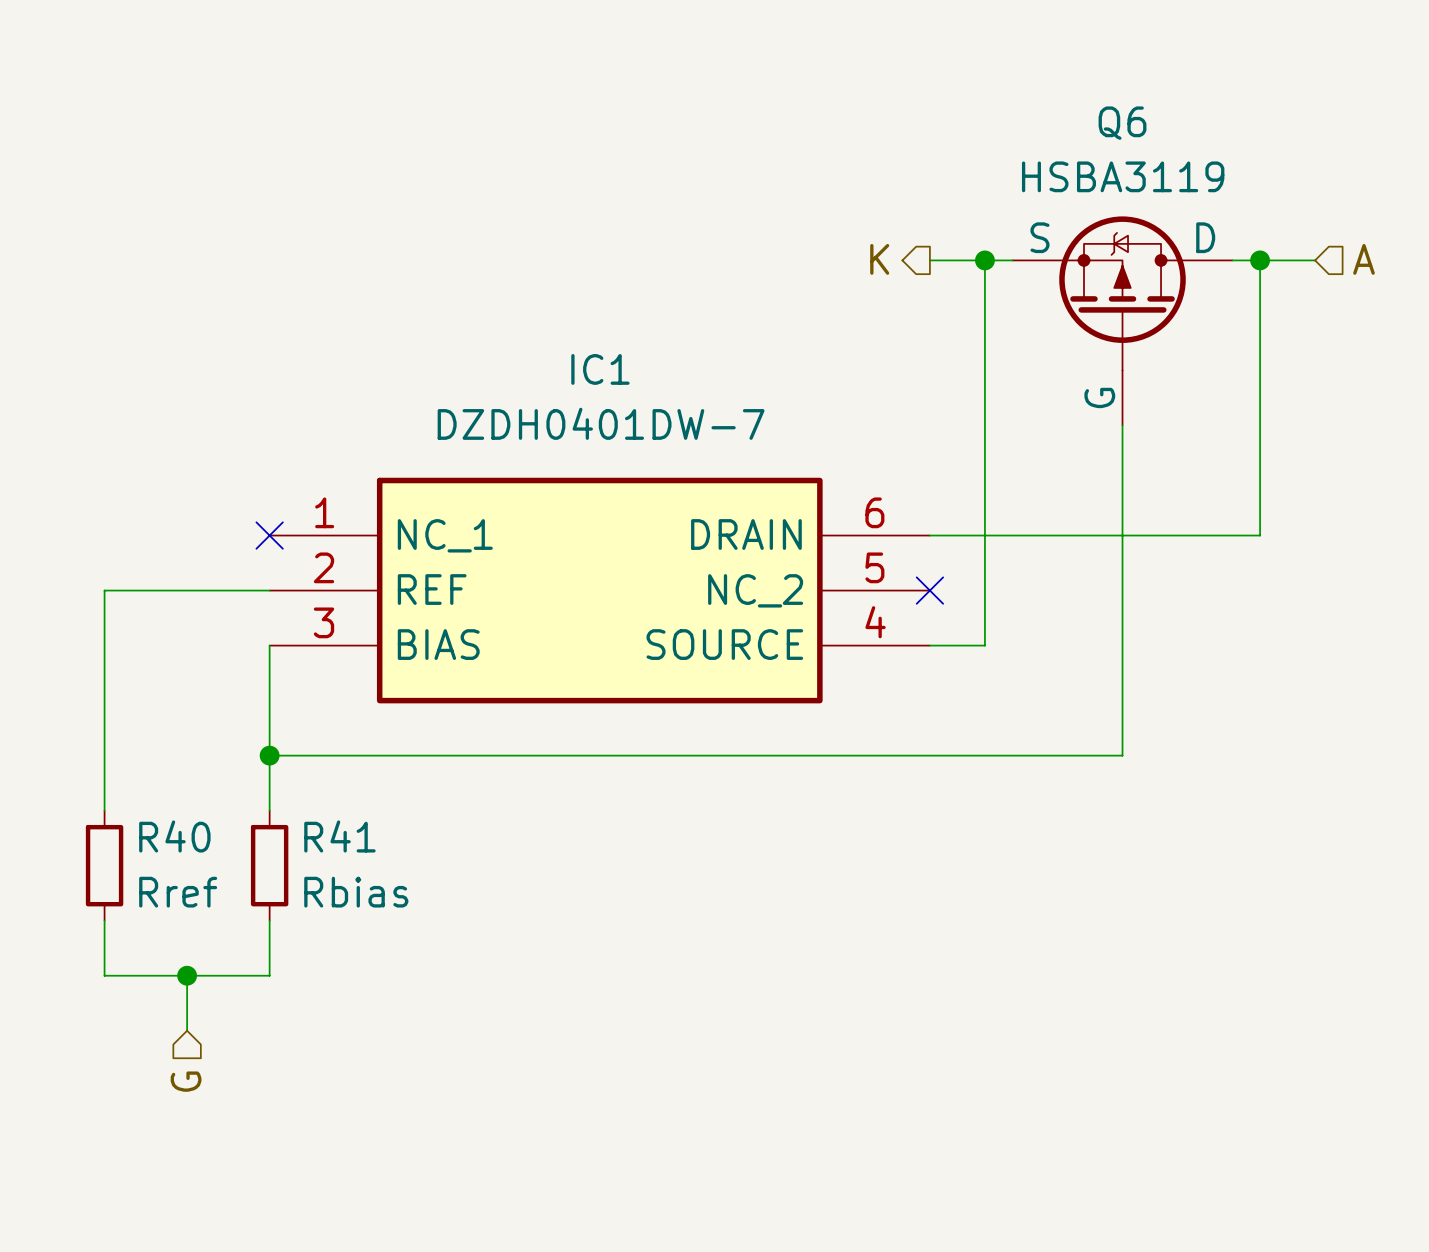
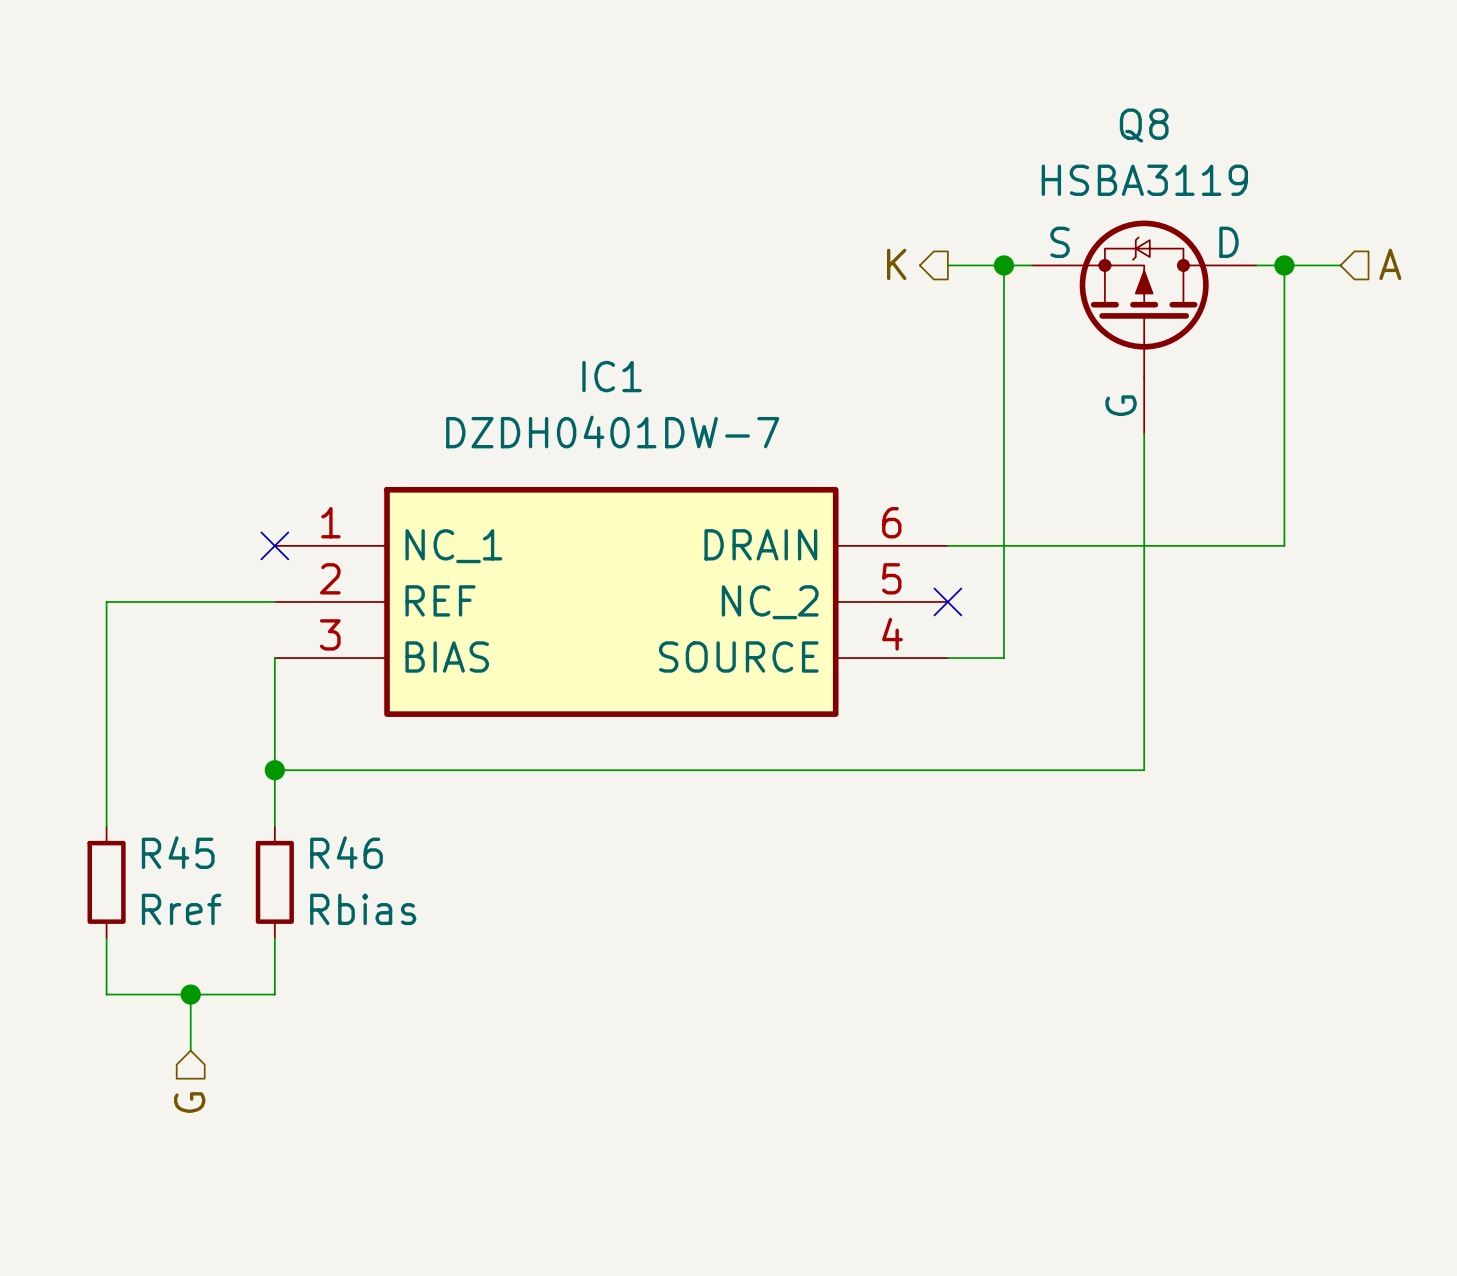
Q6 name: Q6 (1122, 123) -> Q8 (1144, 125)
R40 name: R40 (174, 836) -> R45 (178, 852)
R41 name: R41 (339, 836) -> R46 (346, 852)

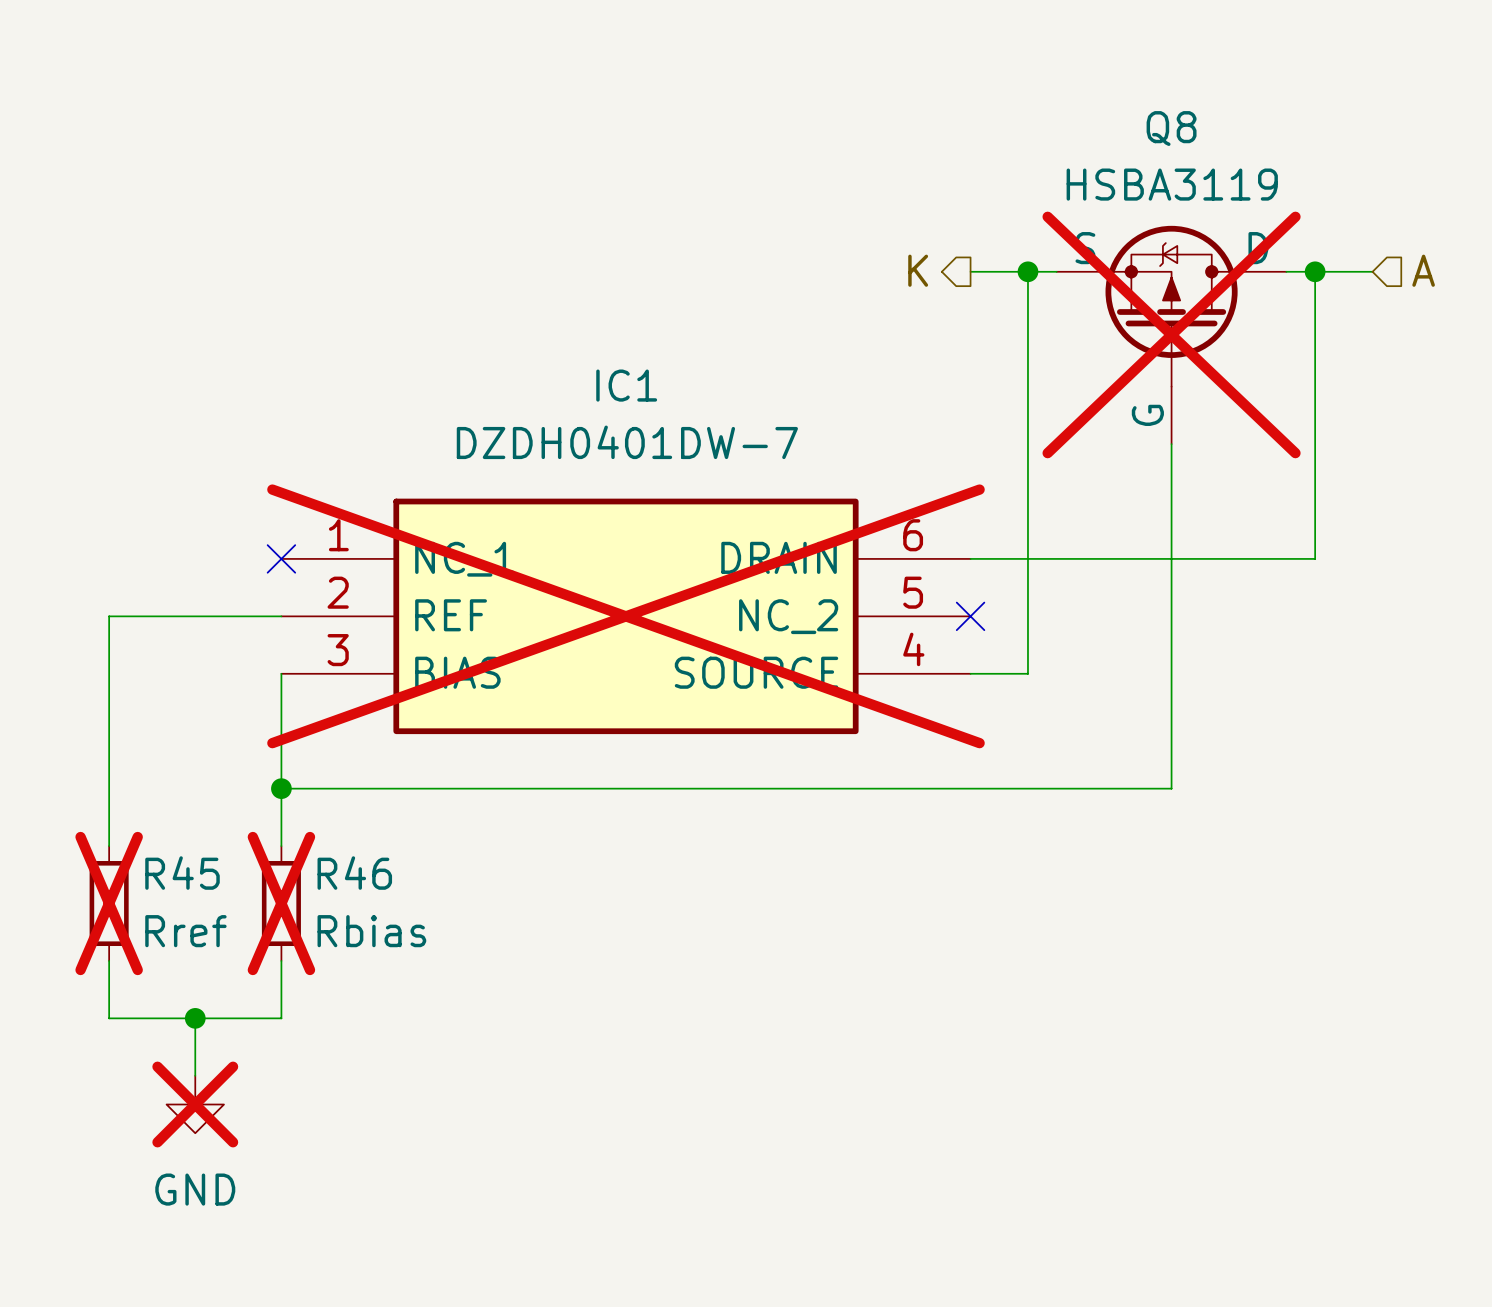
Q8 do-not-place cross: none -> (1171, 334)
IC1 do-not-place cross: none -> (625, 616)
R45 do-not-place cross: none -> (109, 903)
R46 do-not-place cross: none -> (281, 903)
power symbol: none -> GND (195, 1104)
hierarchical label: G (189, 1102) -> none

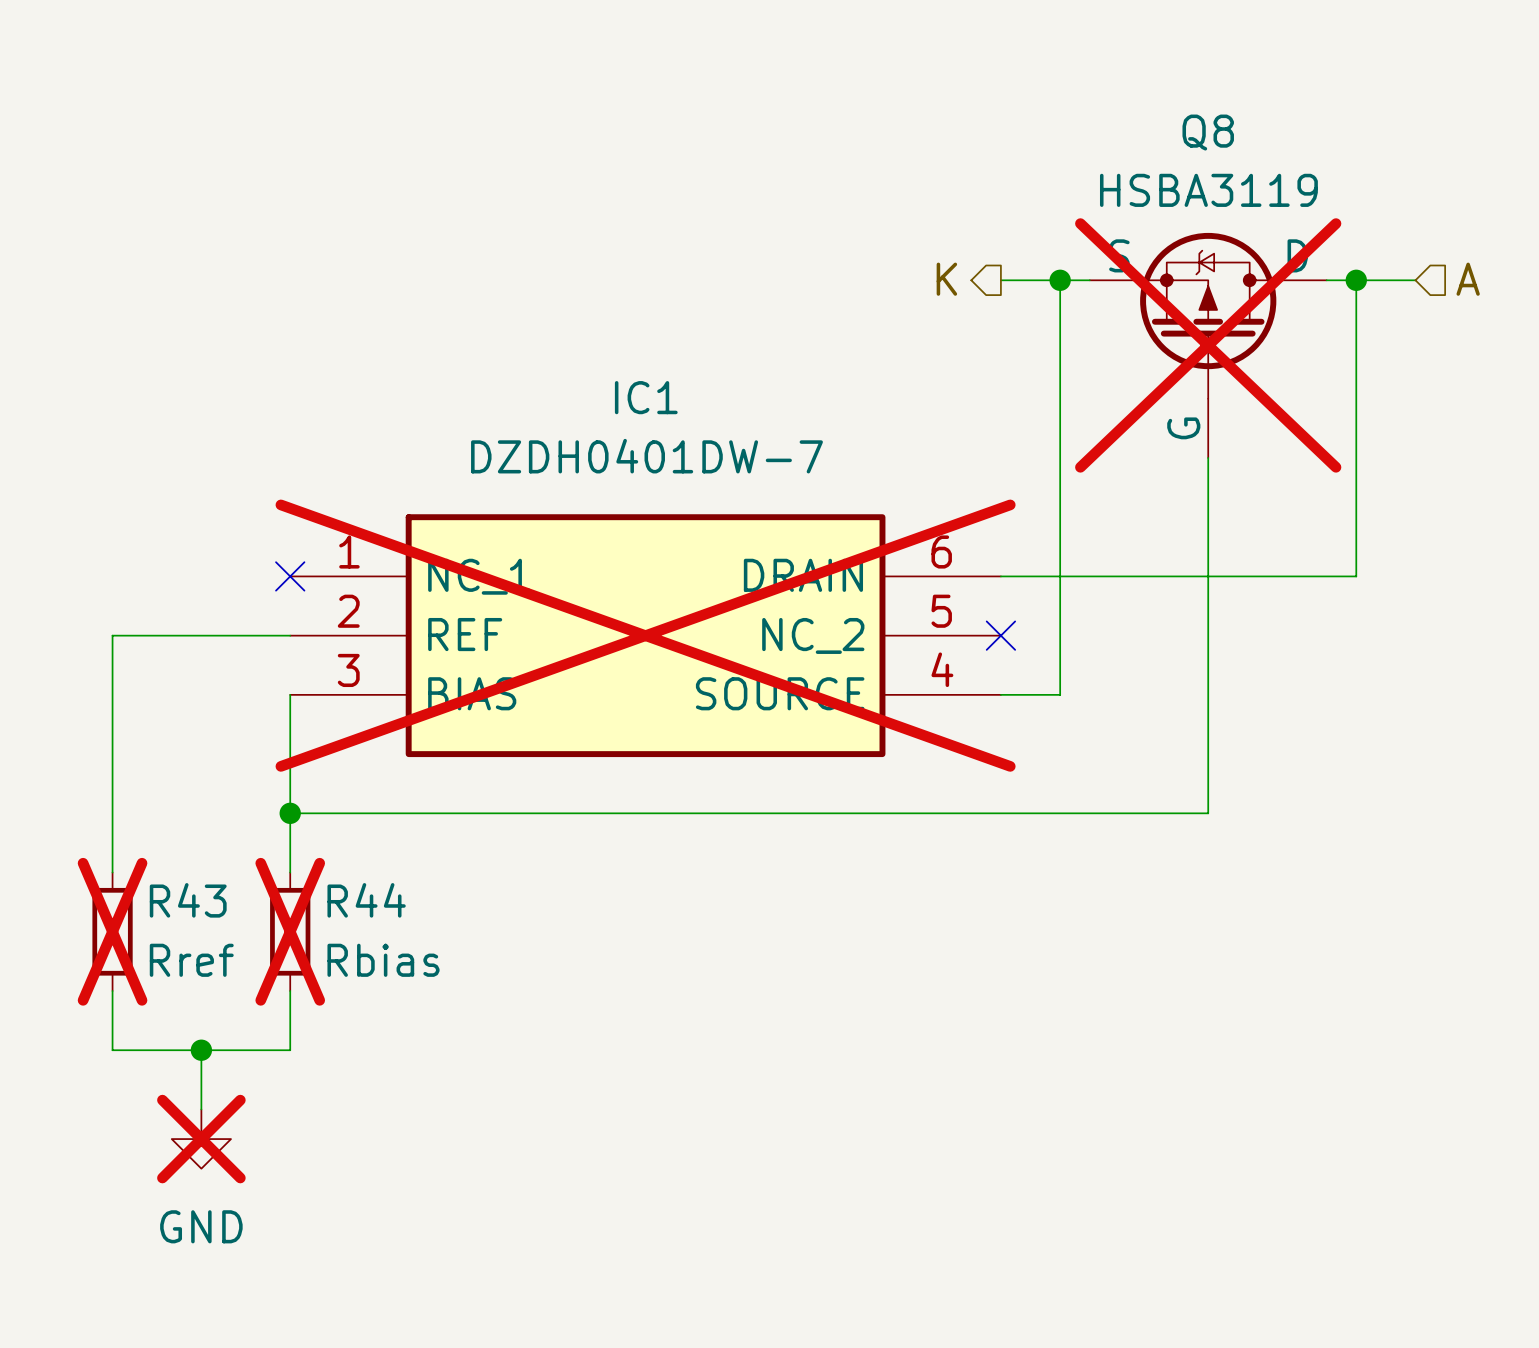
R45 name: R45 (182, 873) -> R43 (188, 900)
R46 name: R46 (354, 873) -> R44 (366, 900)

